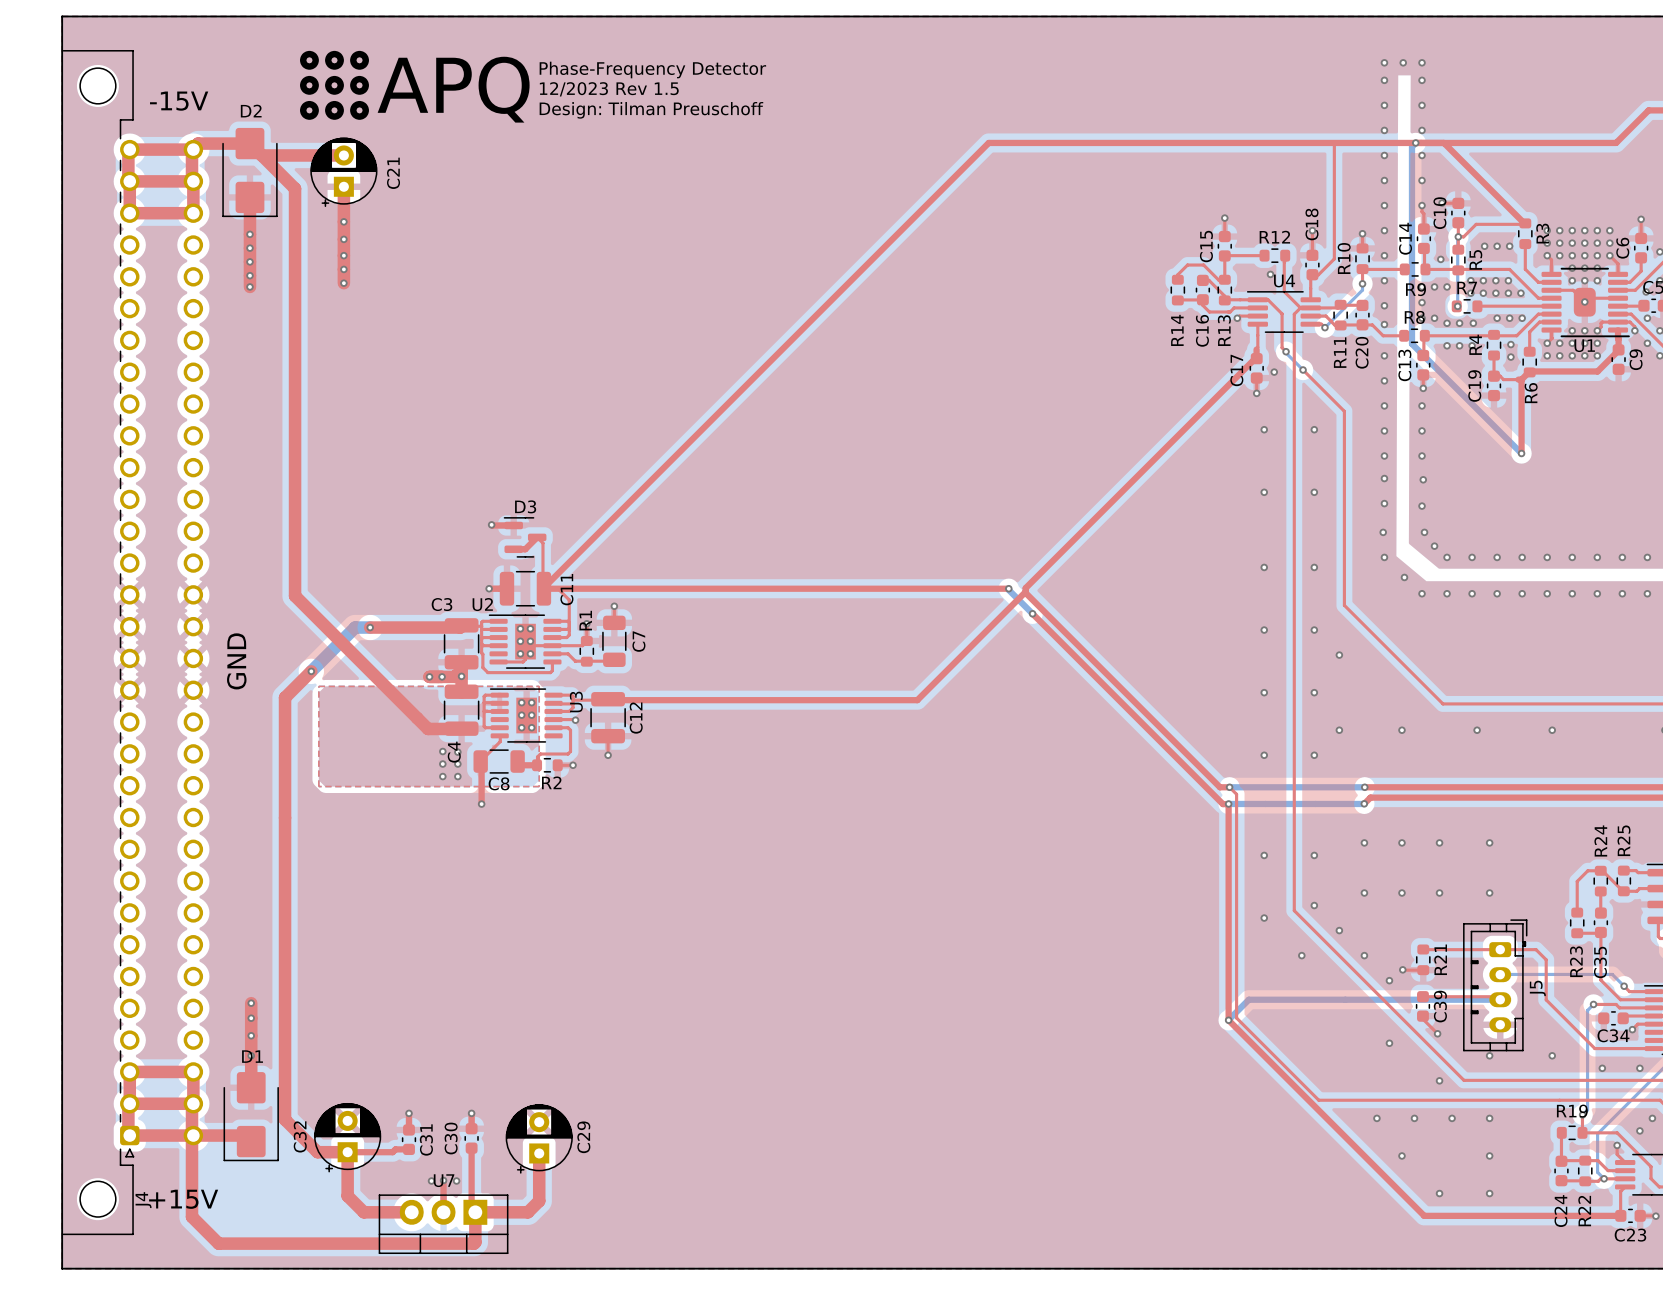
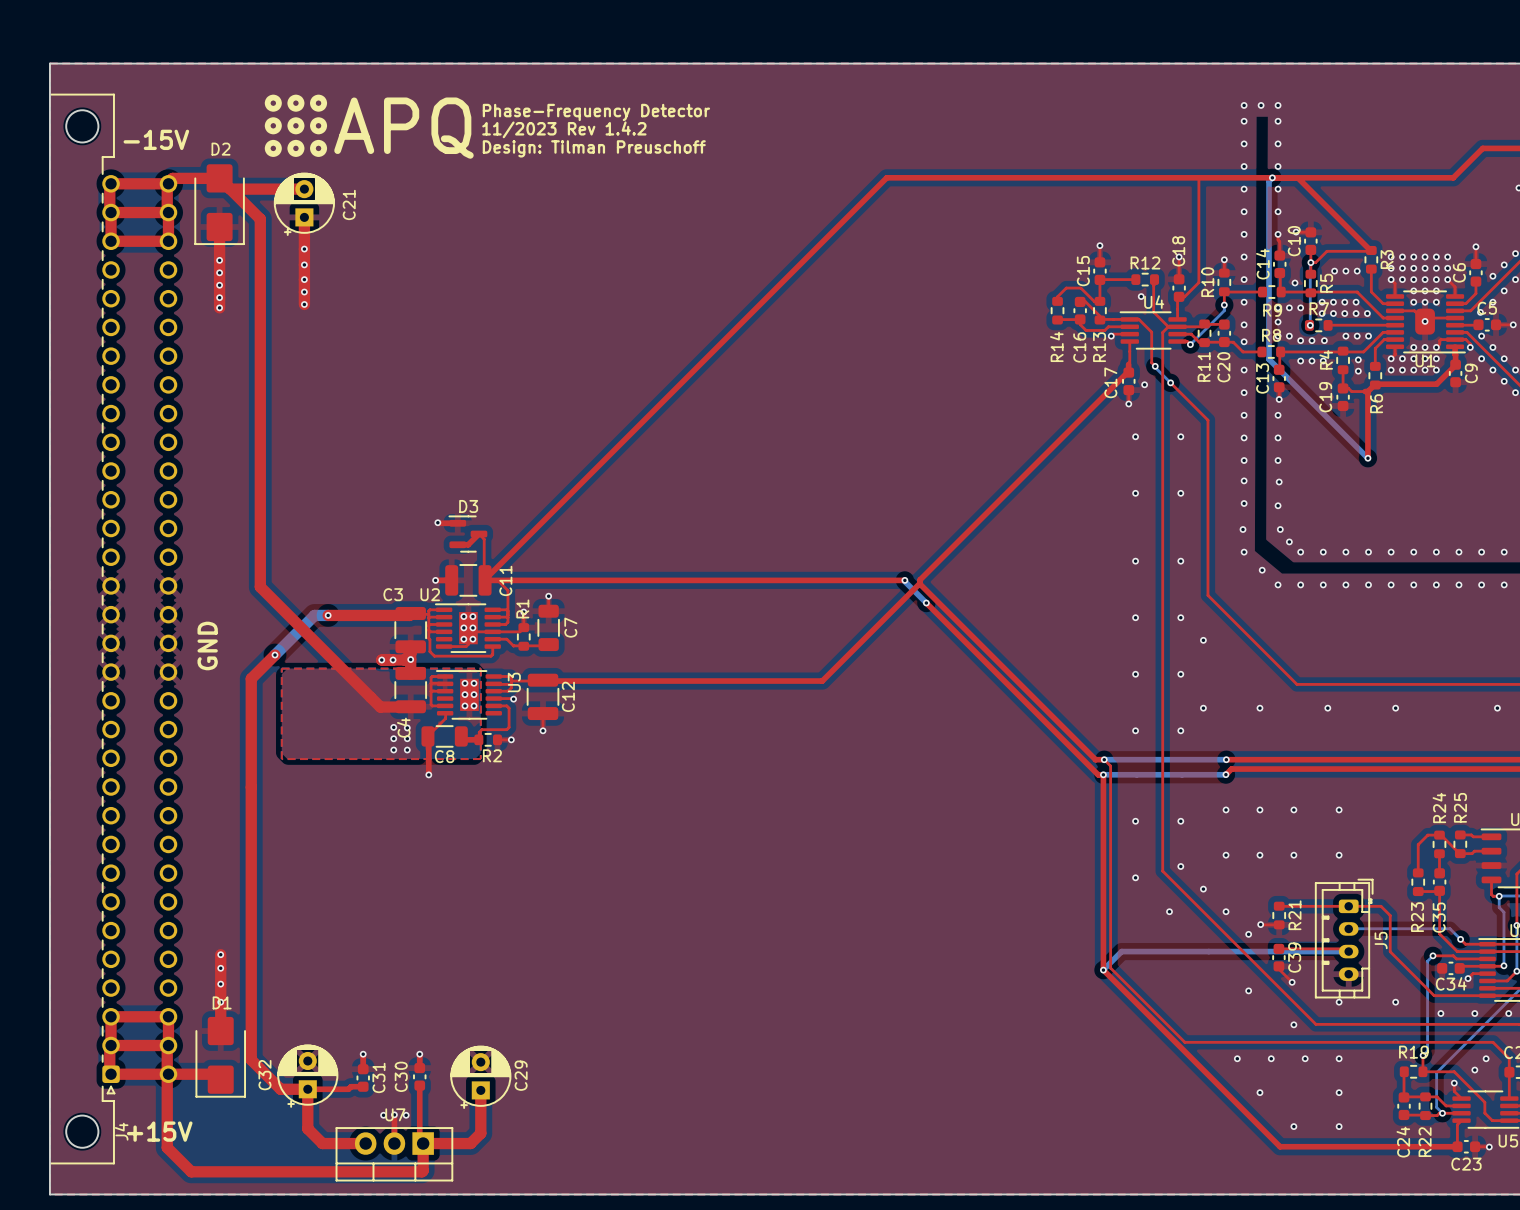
text: 12/2023 Rev 1.5 (609, 89) -> 11/2023 Rev 1.4.2 (564, 129)

